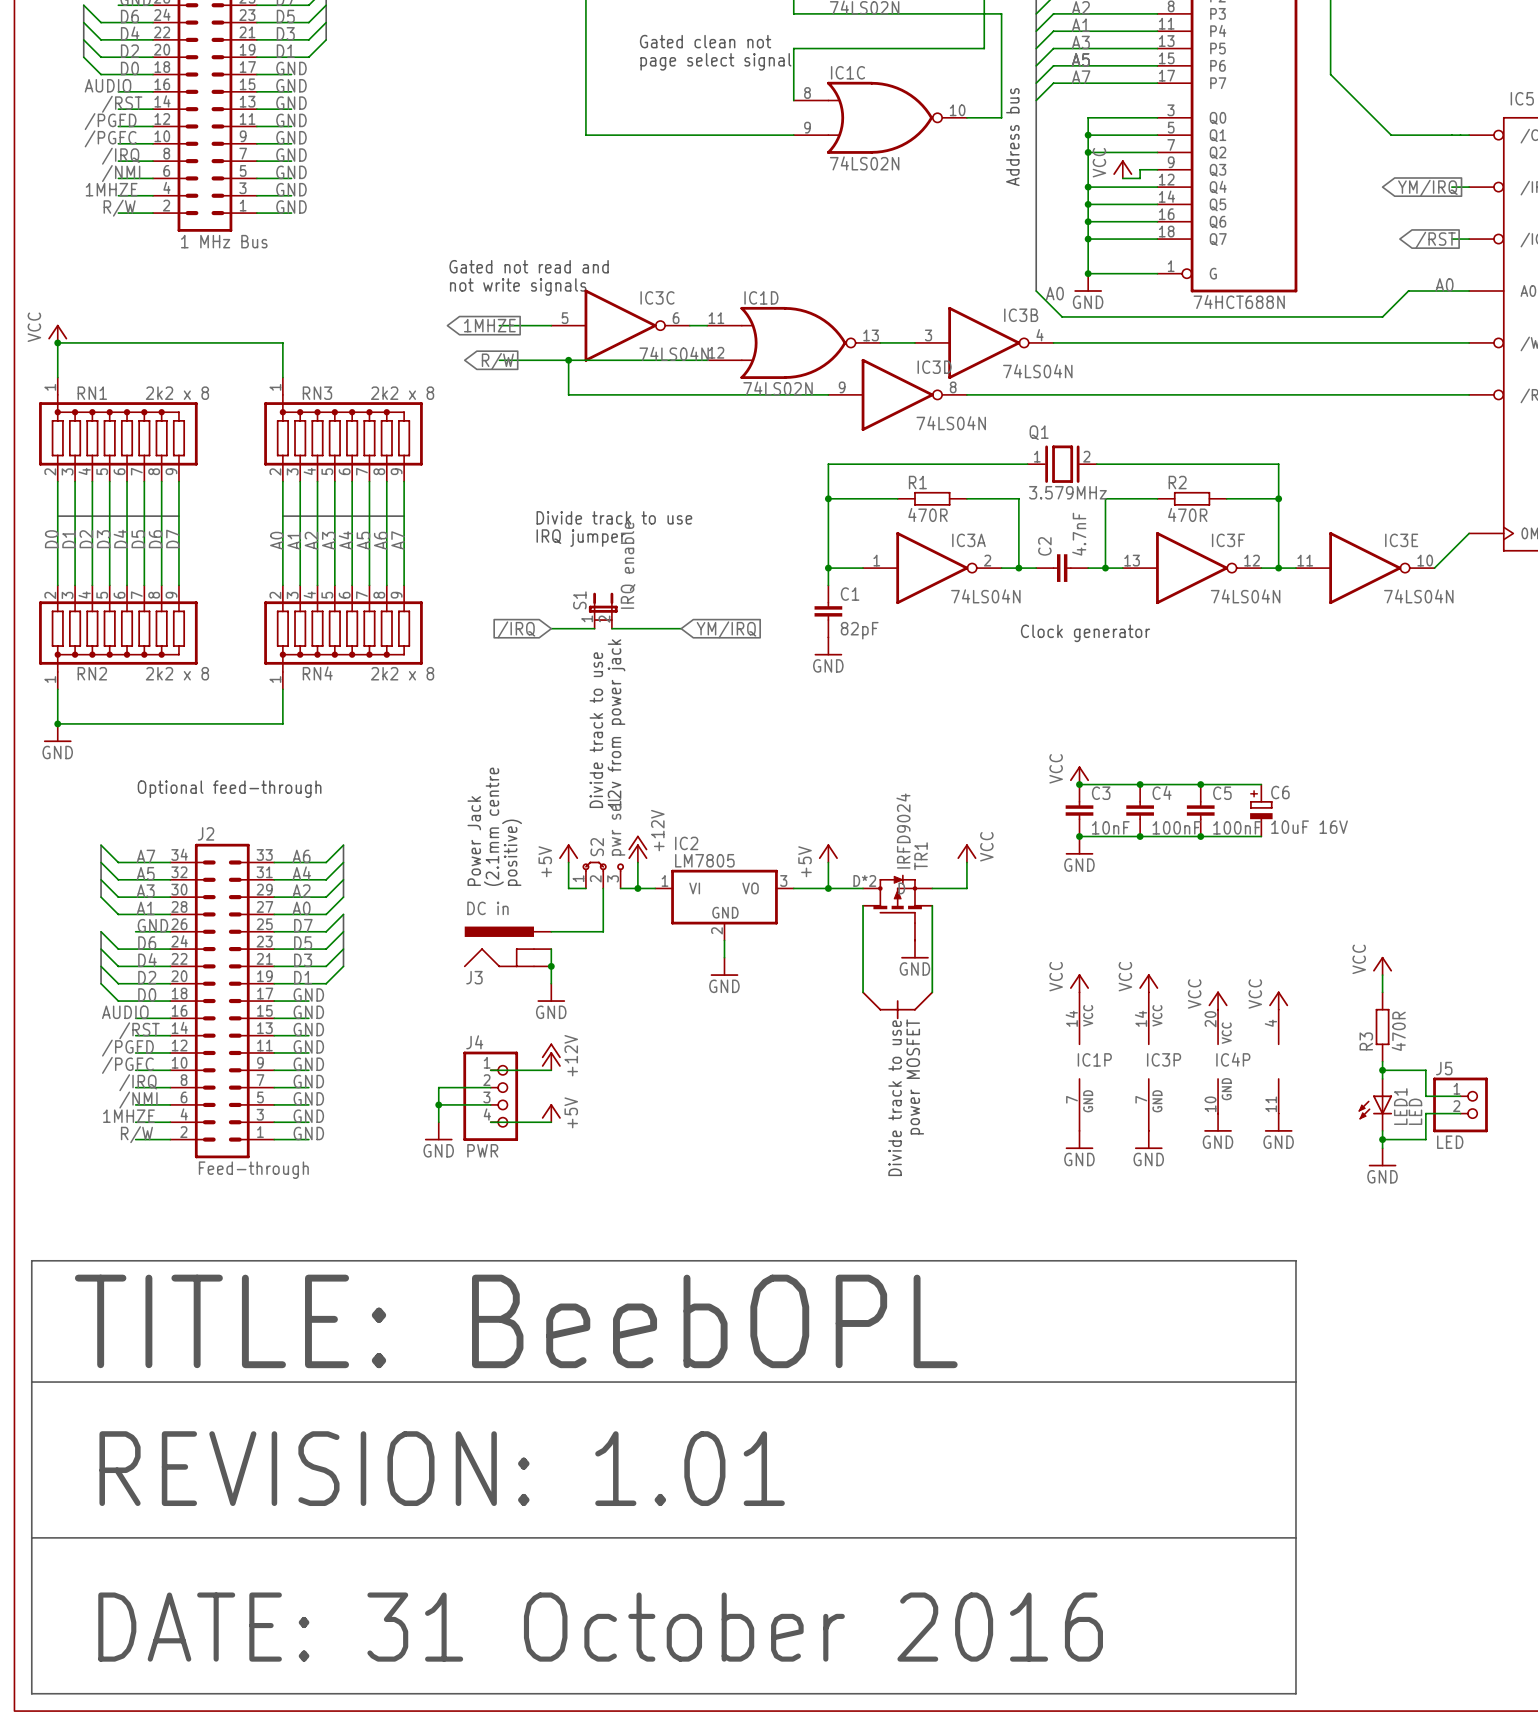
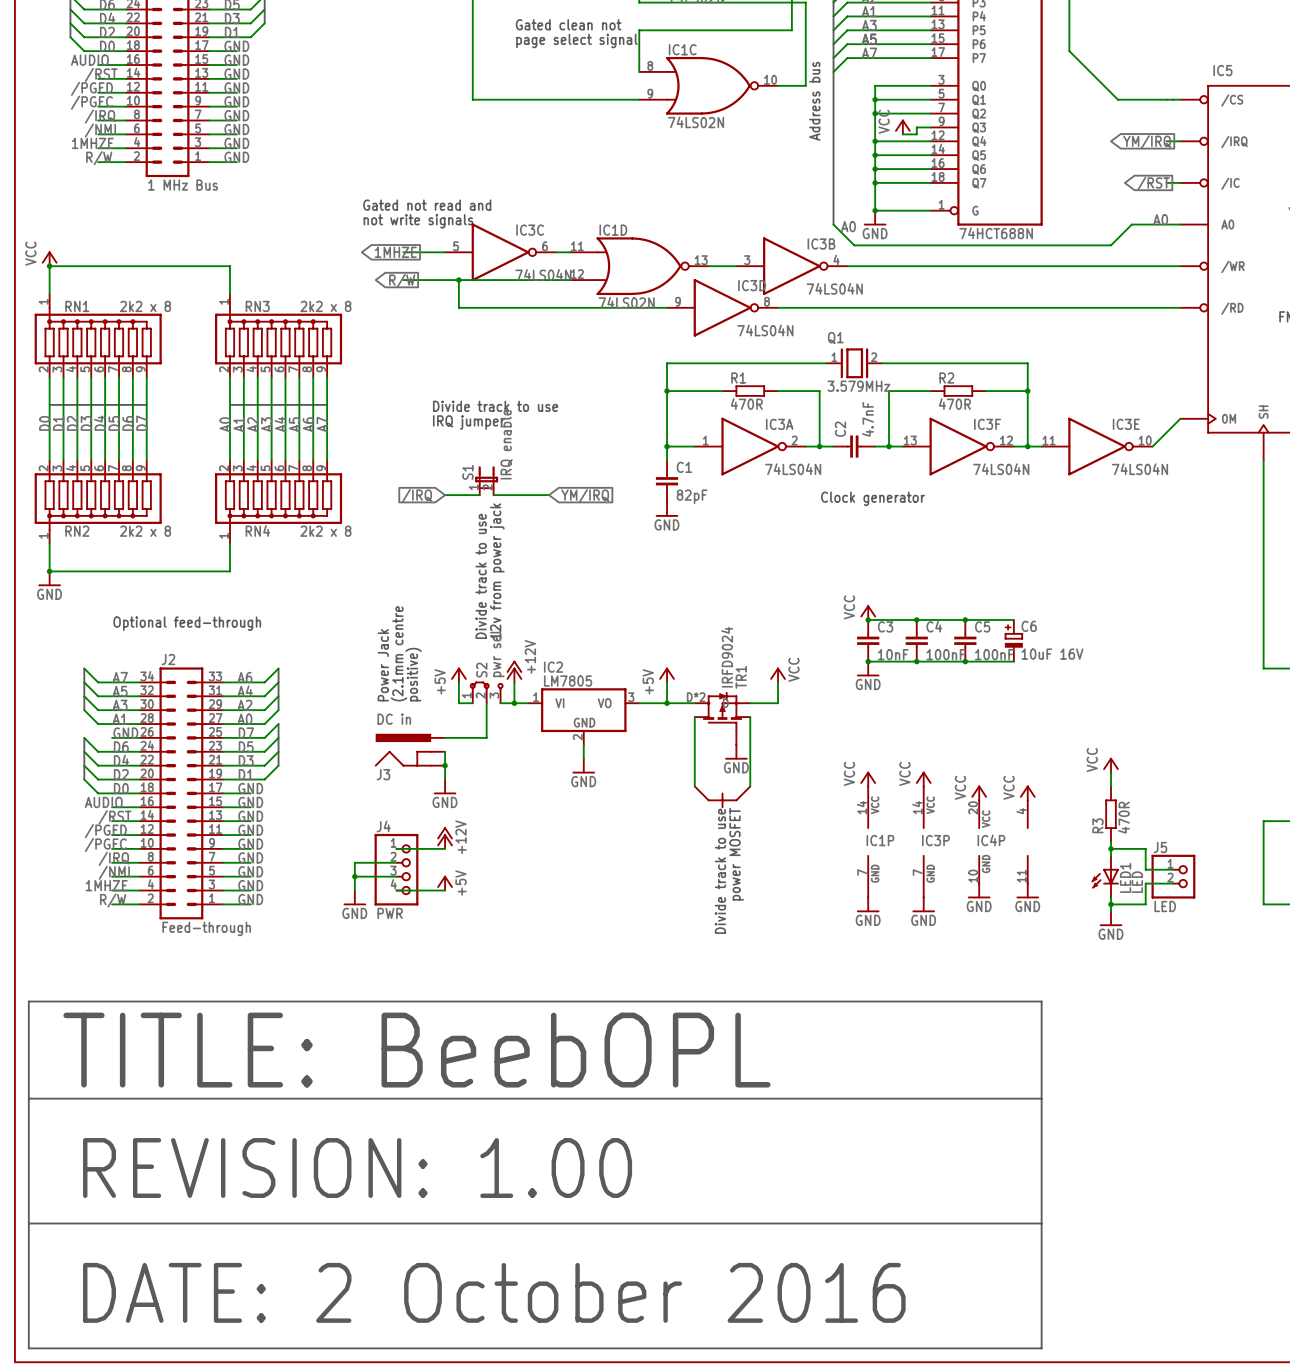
text: REVISION: 1.01 (442, 1468) -> REVISION: 1.00 (357, 1168)
text: DATE: 31 October 2016 (600, 1627) -> DATE: 2 October 2016 (494, 1292)

